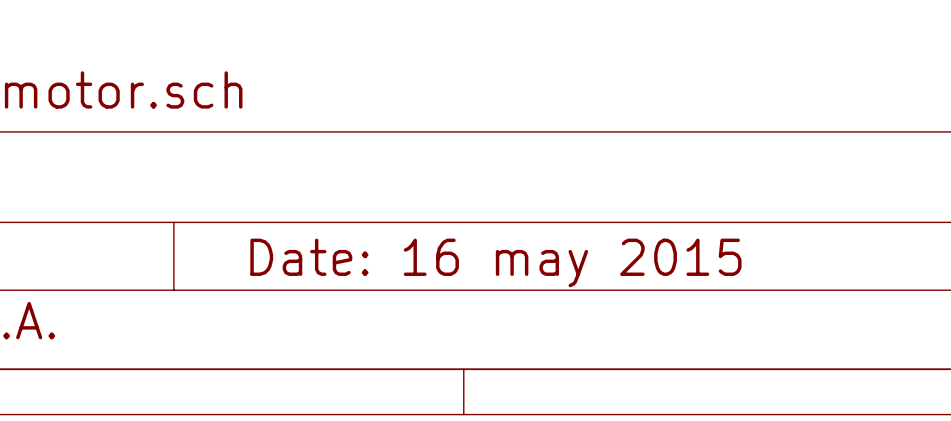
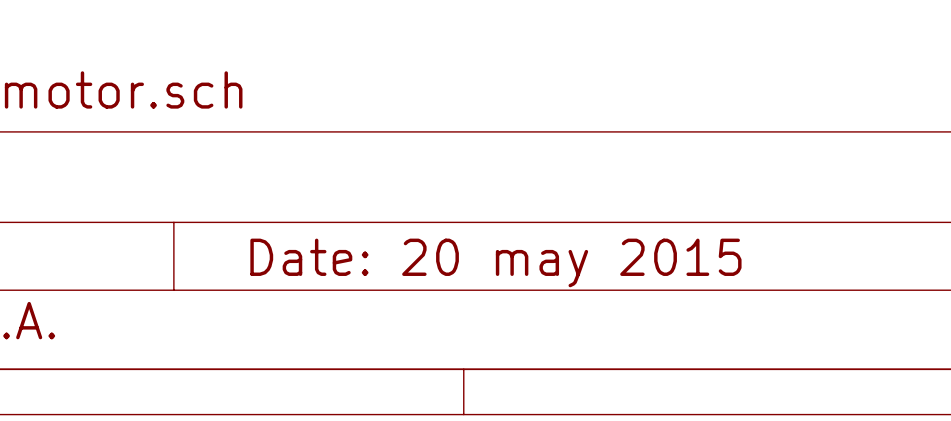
title block: Date: 16 may 2015 (495, 262) -> Date: 20 may 2015 (495, 262)

